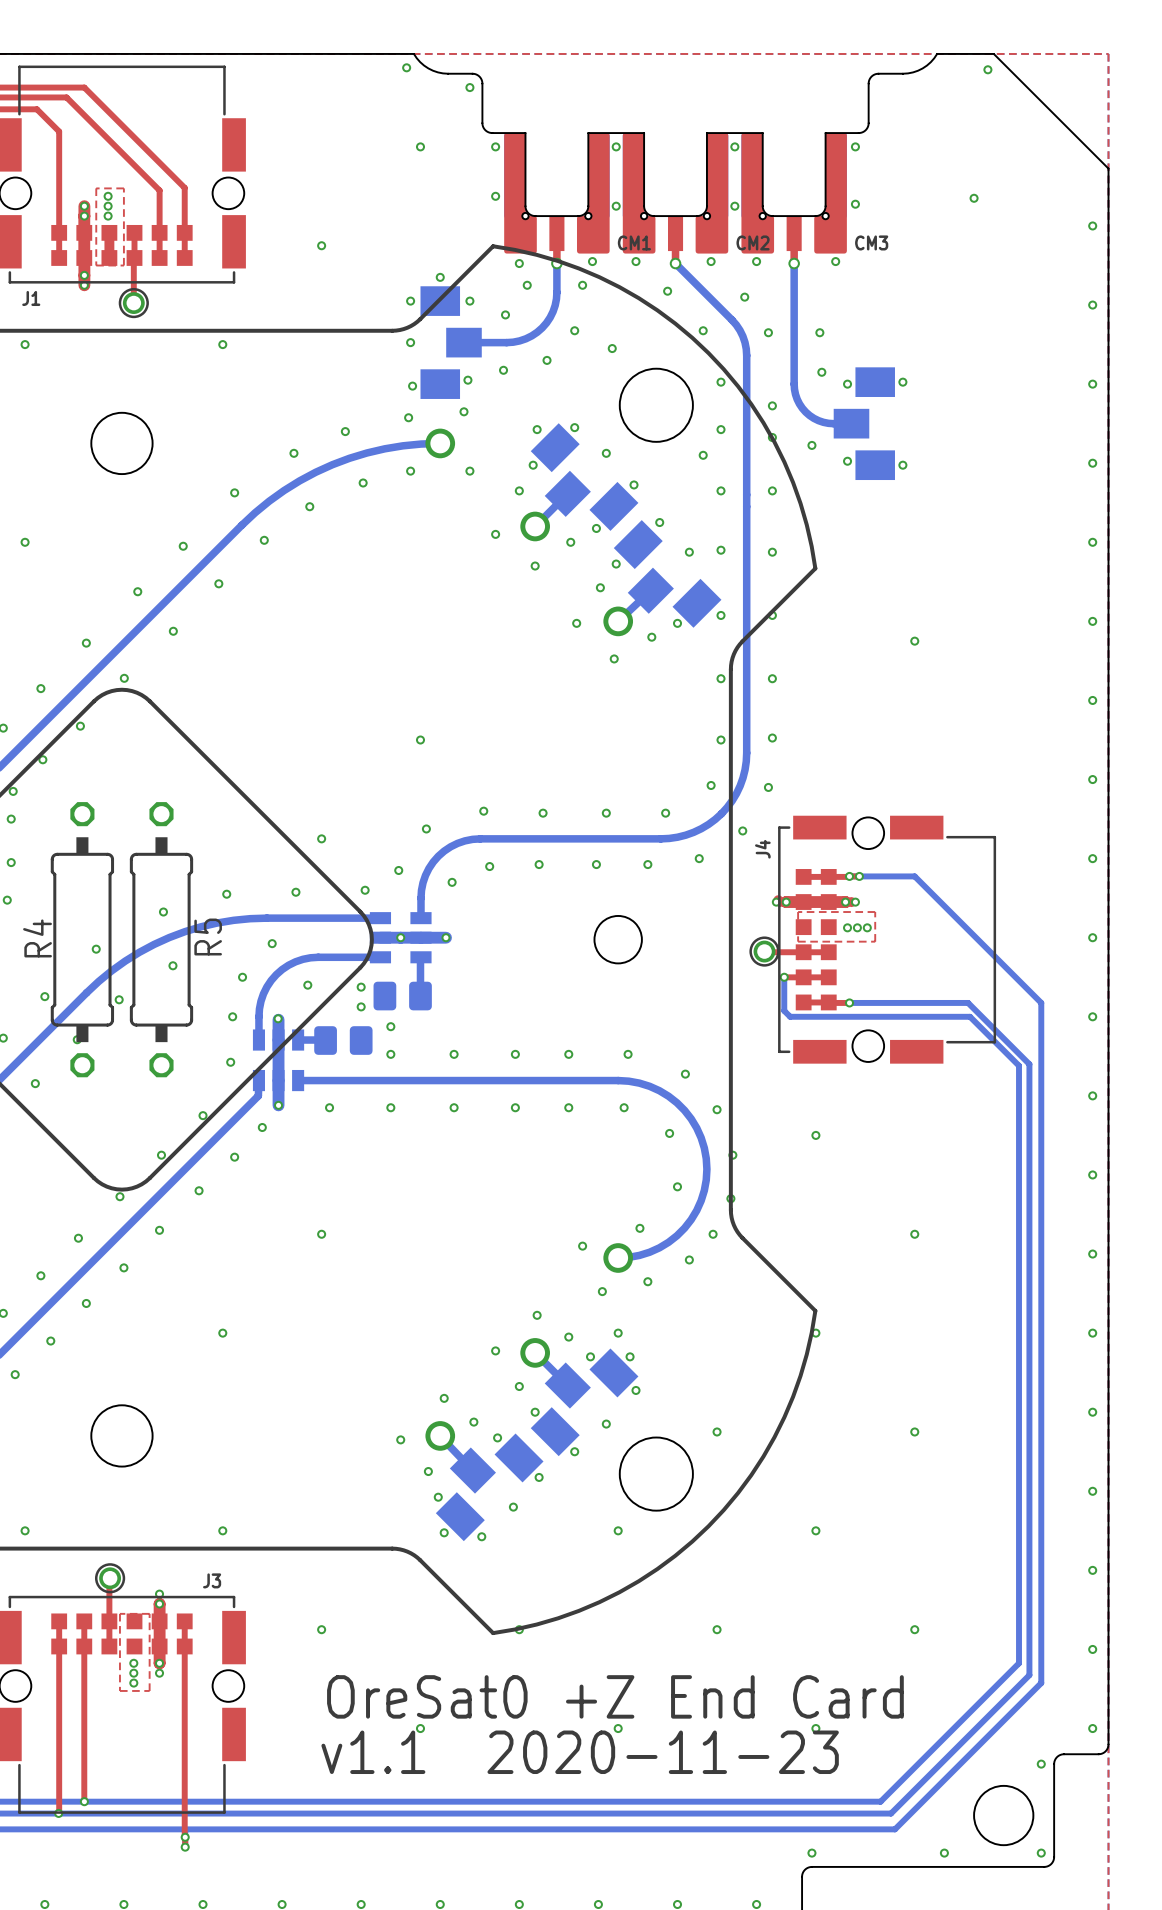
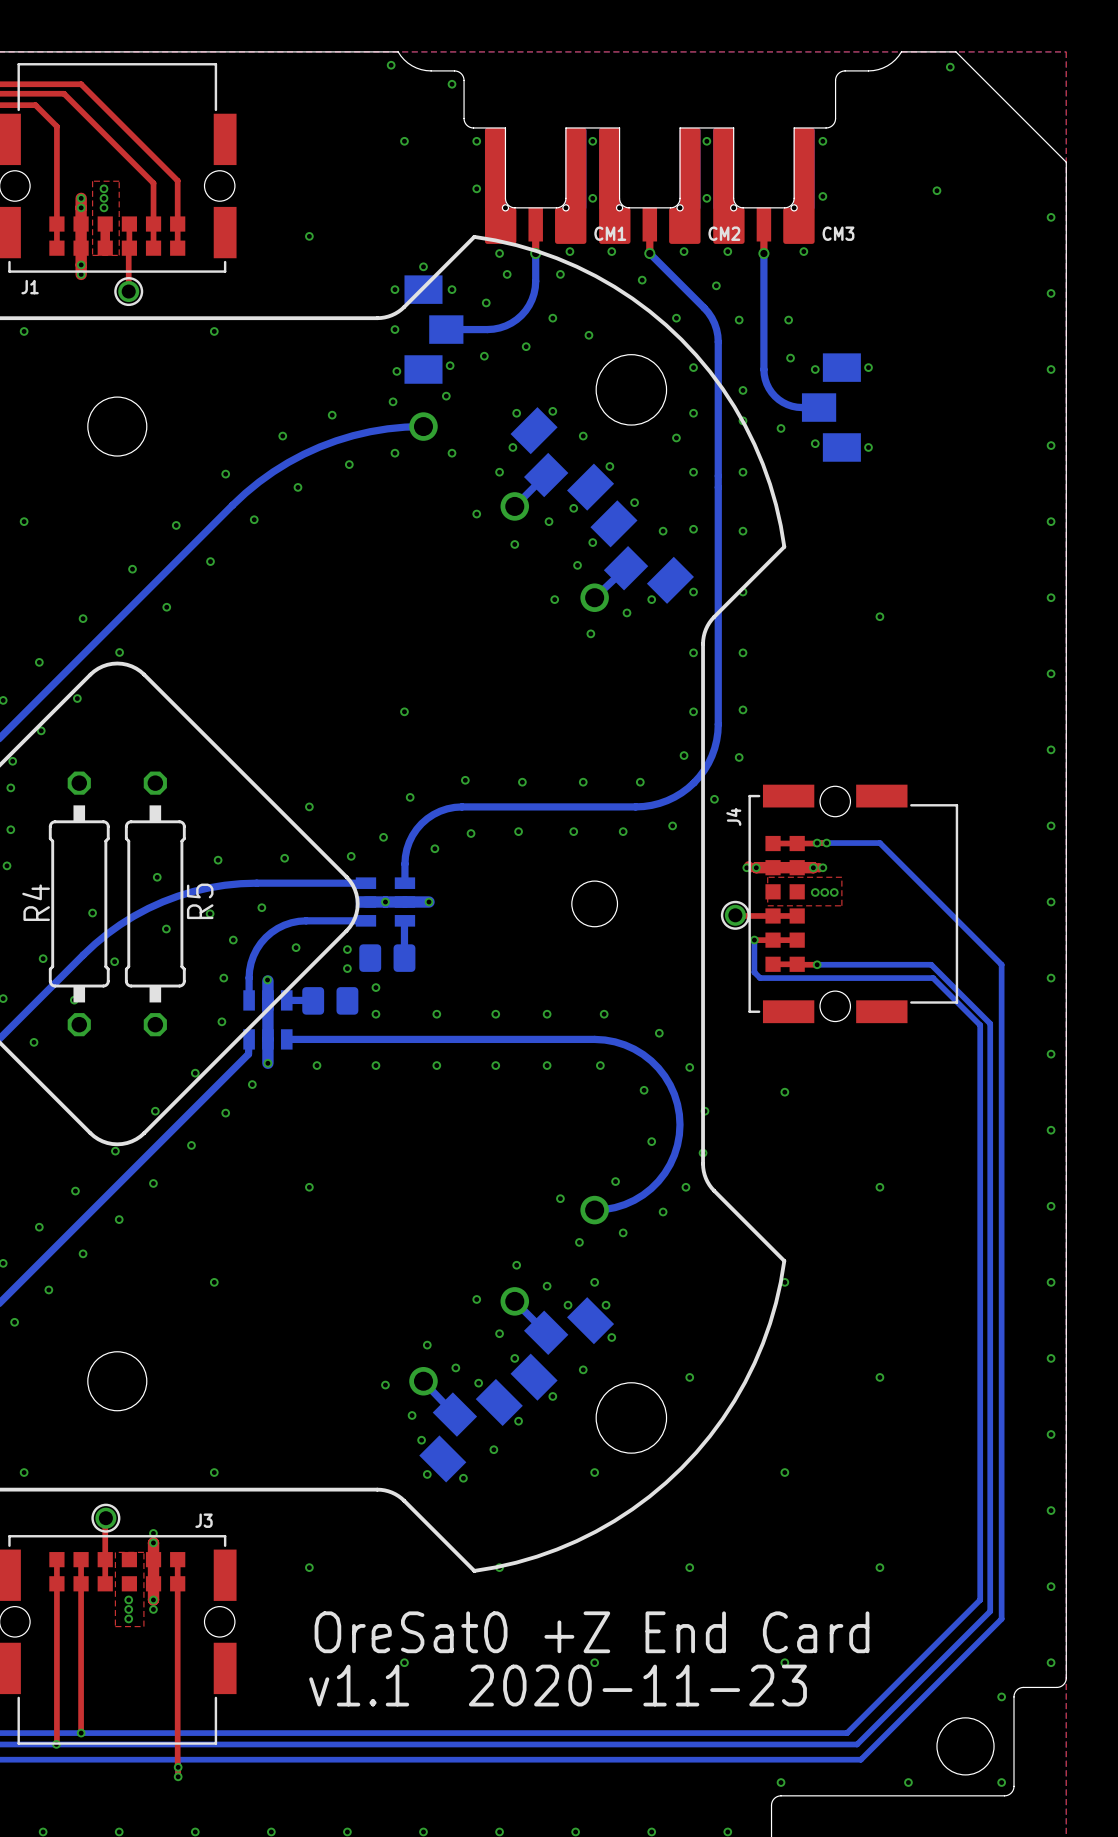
via: none -> (210, 913)

